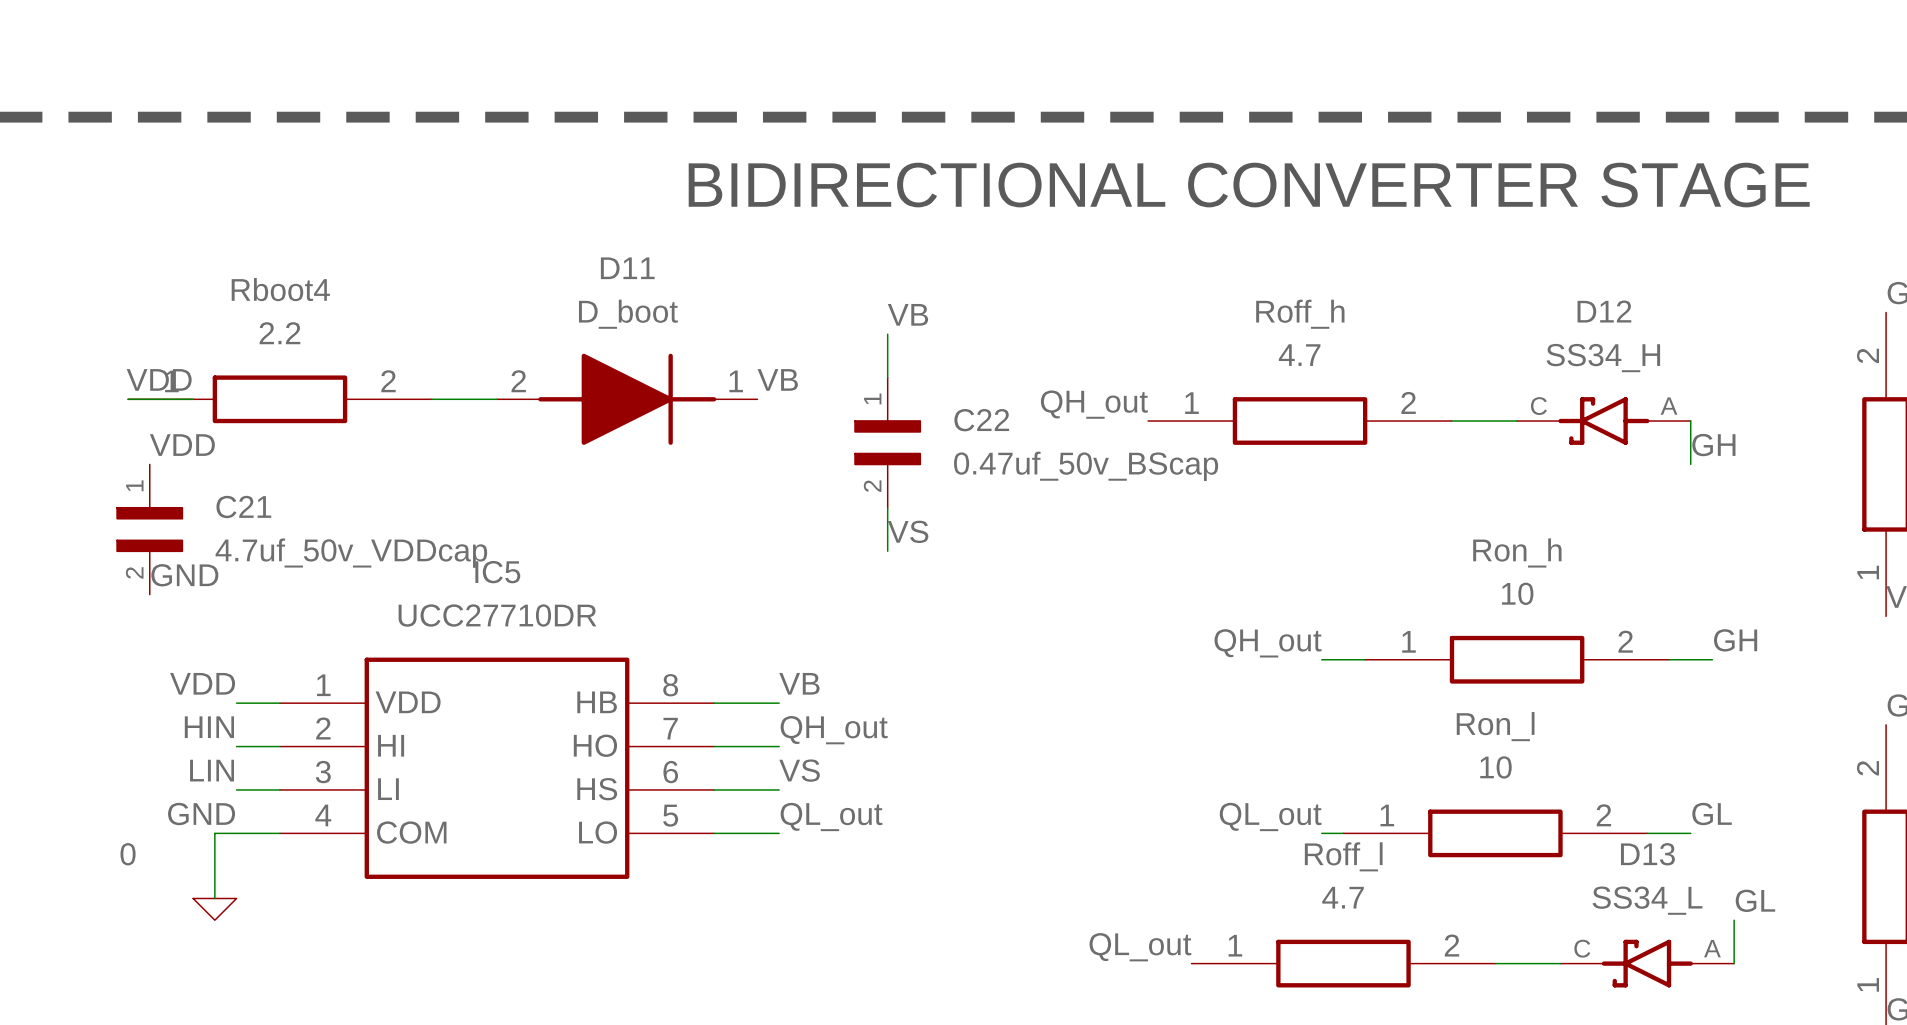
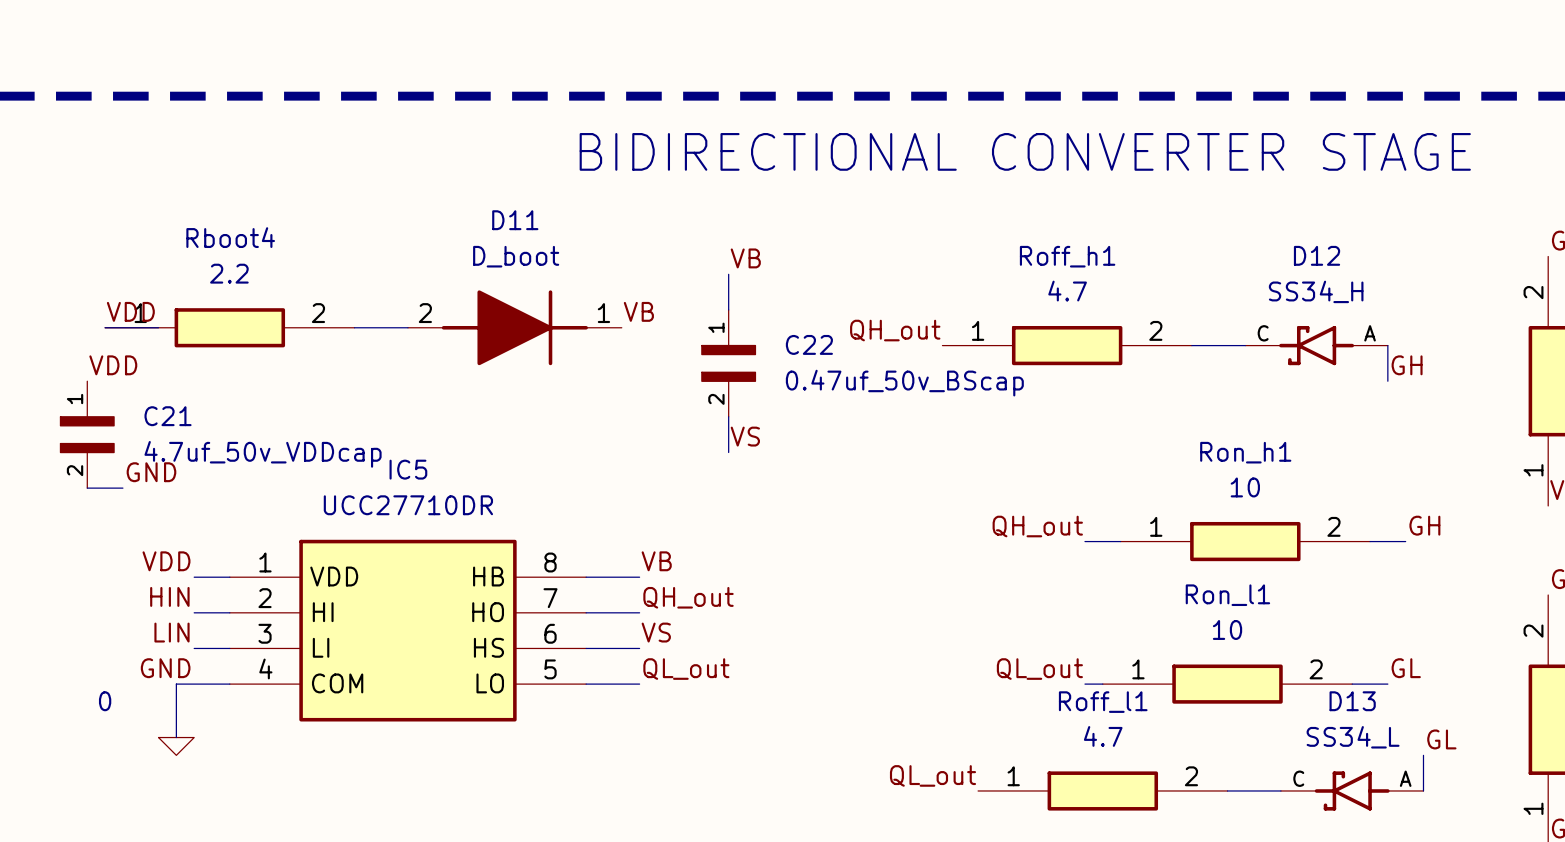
Roff_h name: Roff_h (1300, 314) -> Roff_h1 (1067, 256)
label position: VDD (182, 445) -> VDD (113, 365)
C21 position: (149, 529) -> (87, 434)
Ron_h name: Ron_h (1517, 552) -> Ron_h1 (1245, 452)
wire: none -> (87, 488) (122, 488)
Ron_l name: Ron_l (1495, 726) -> Ron_l1 (1227, 595)
Roff_l name: Roff_l (1343, 856) -> Roff_l1 (1103, 702)

